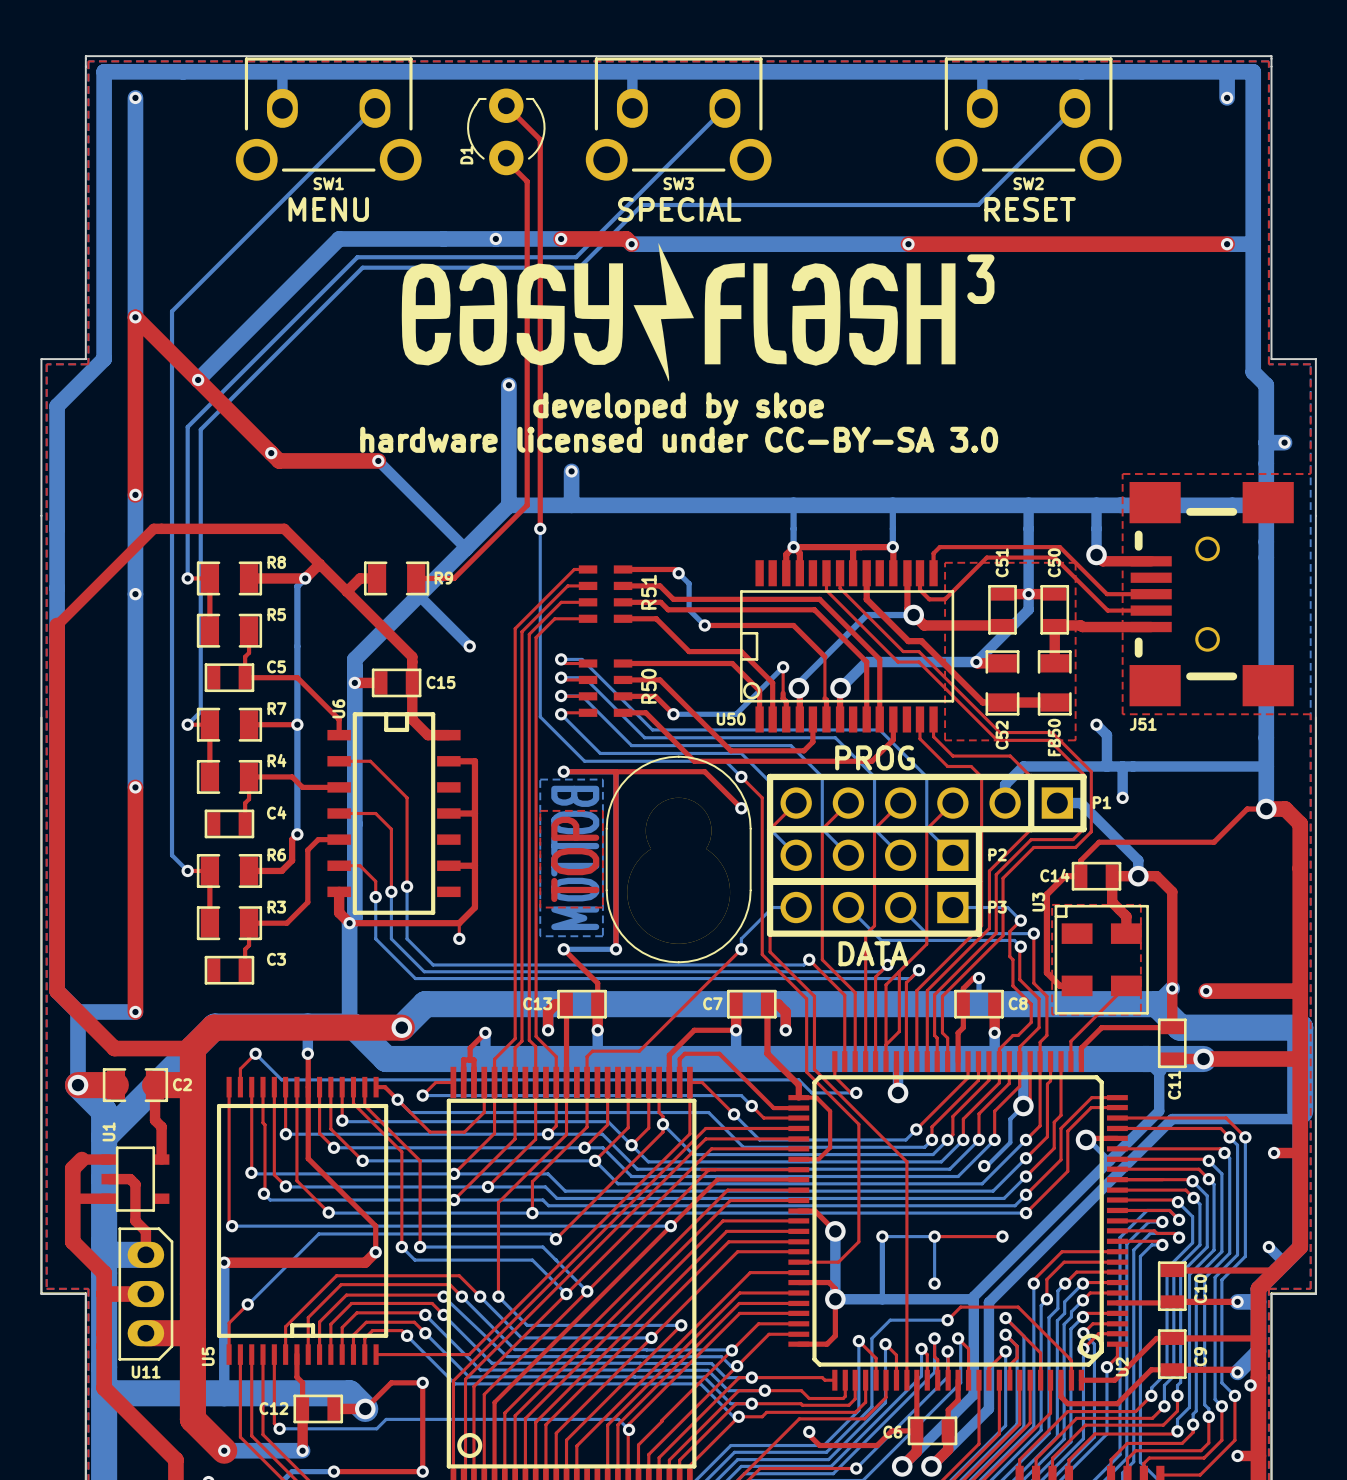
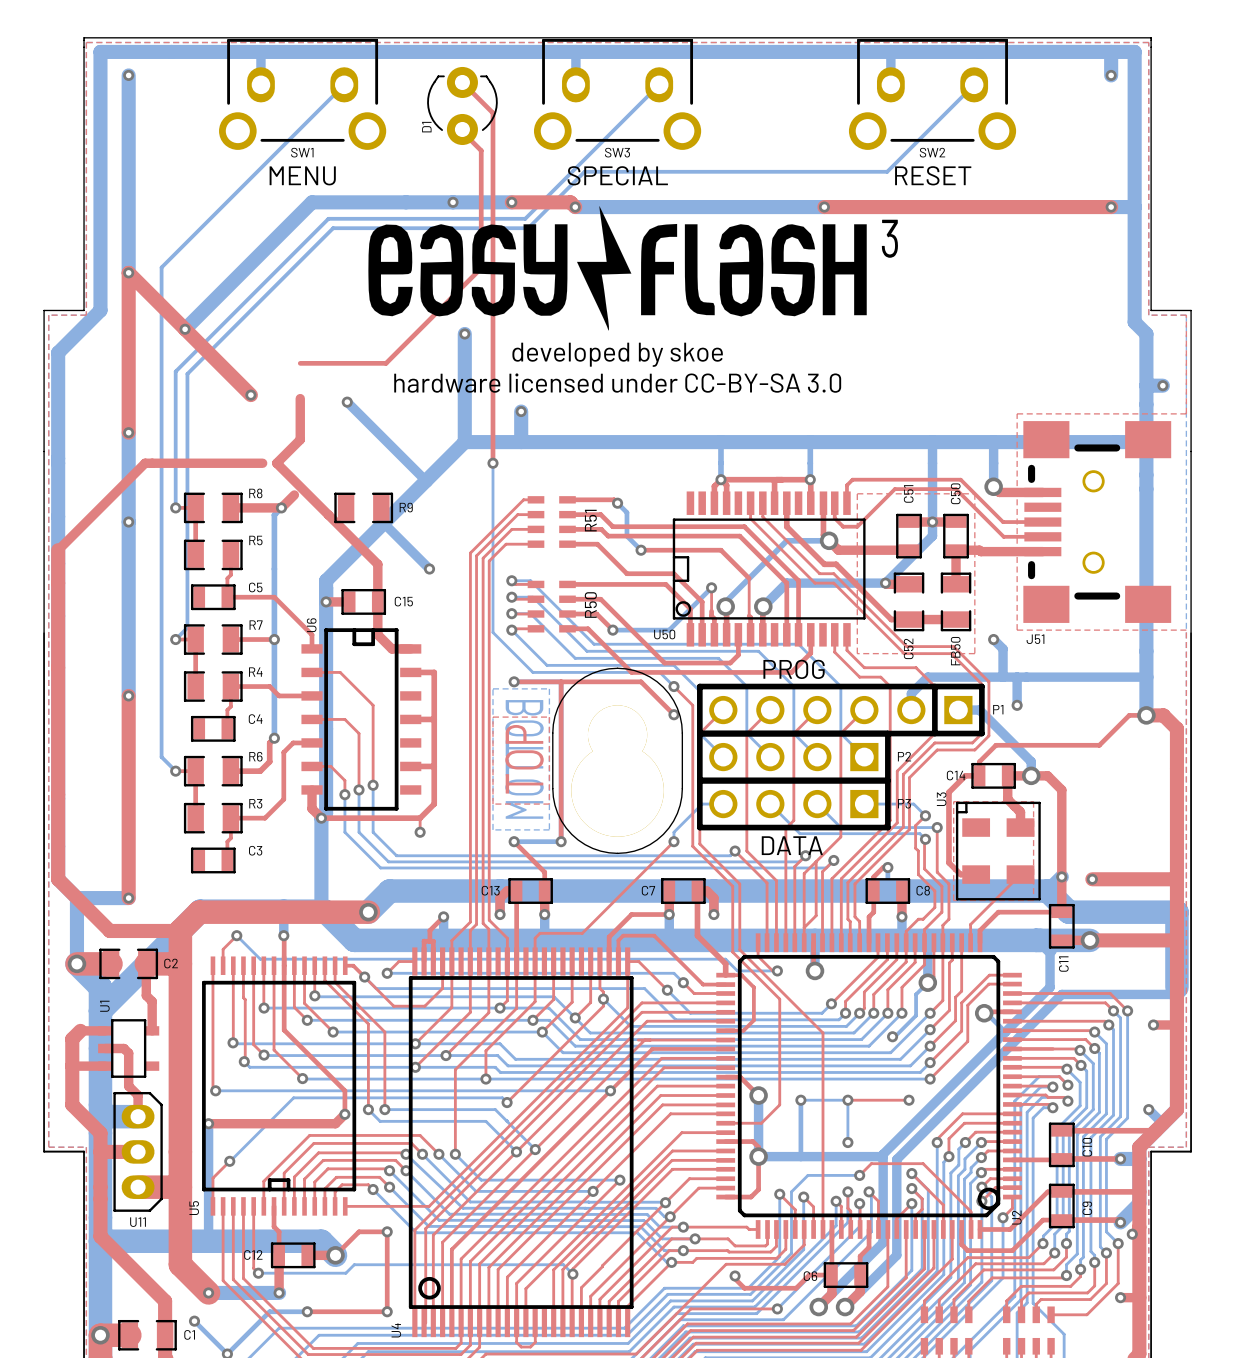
top track: (527, 312) (527, 505) (454, 578) (416, 578) -> (481, 268) (386, 363) (300, 363)
top track: (271, 453) (279, 460) (378, 460) -> none
top track: (284, 528) (412, 656) -> (300, 398) (300, 439) (276, 463) (377, 564) (377, 578)
top track: (377, 578) (360, 578) (346, 591) -> none

